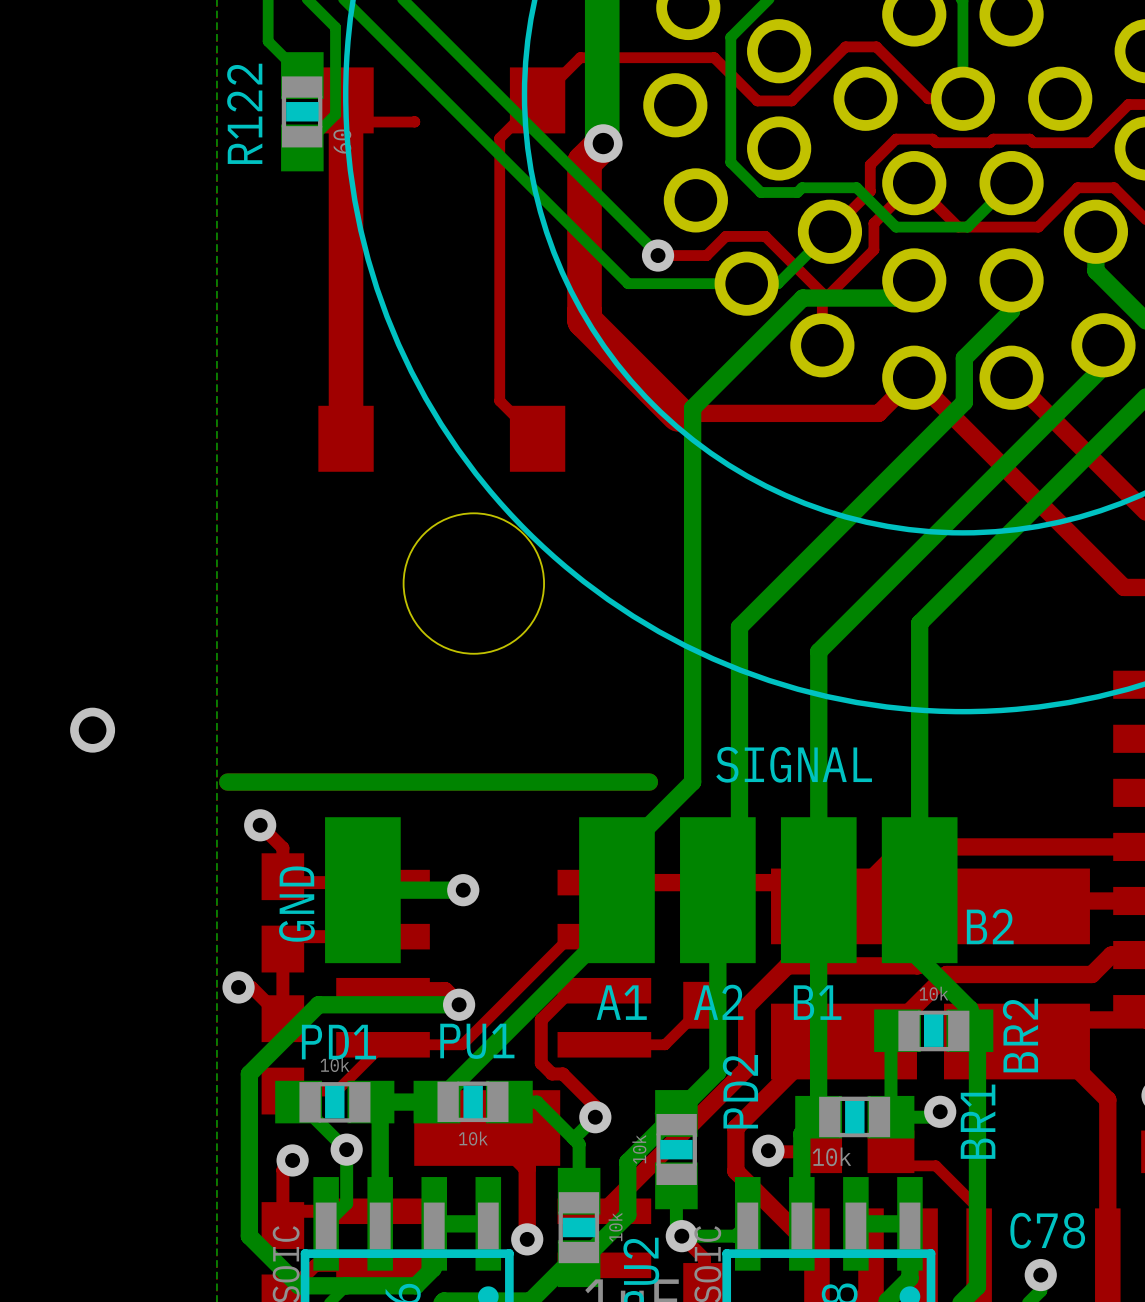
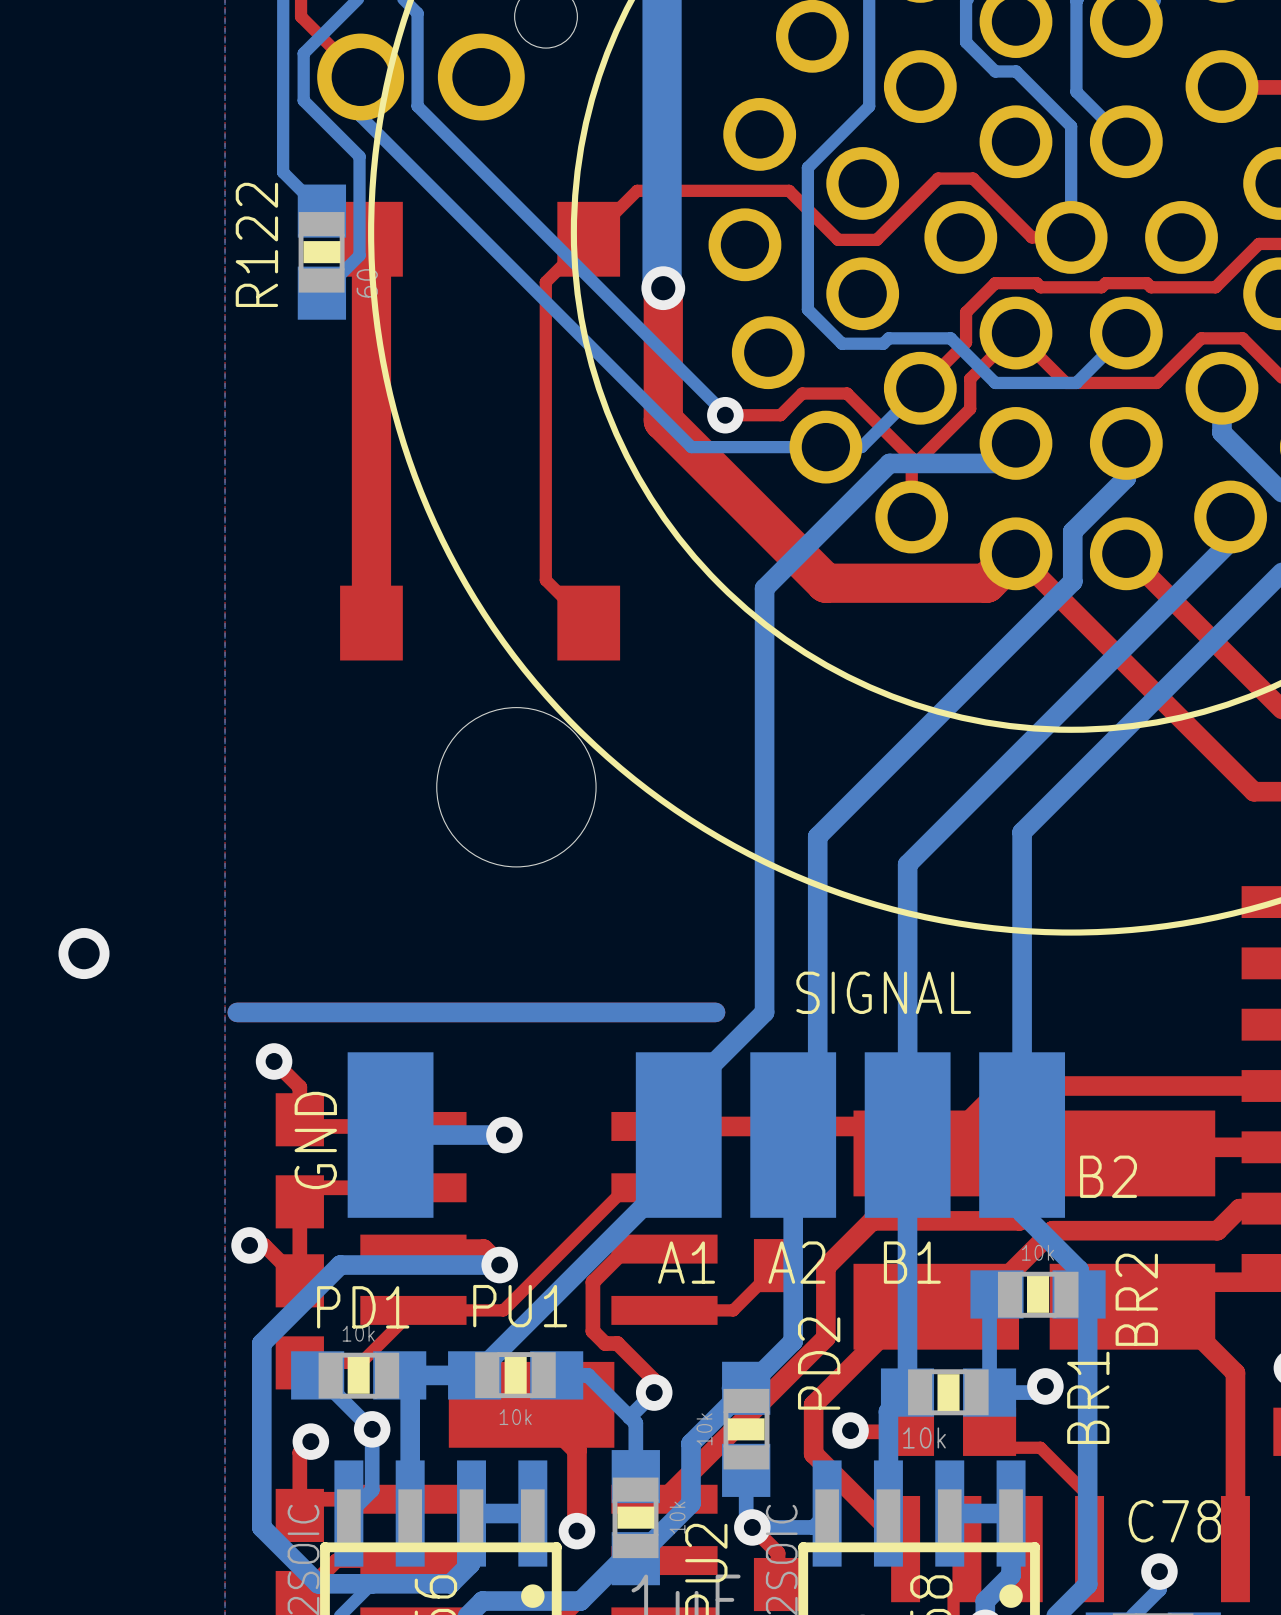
top track: (414, 122) (367, 122) -> none
top track: (603, 143) (584, 162) (584, 320) (678, 414) (878, 413) (888, 403) -> (663, 288) (663, 420) (825, 583) (986, 583)

